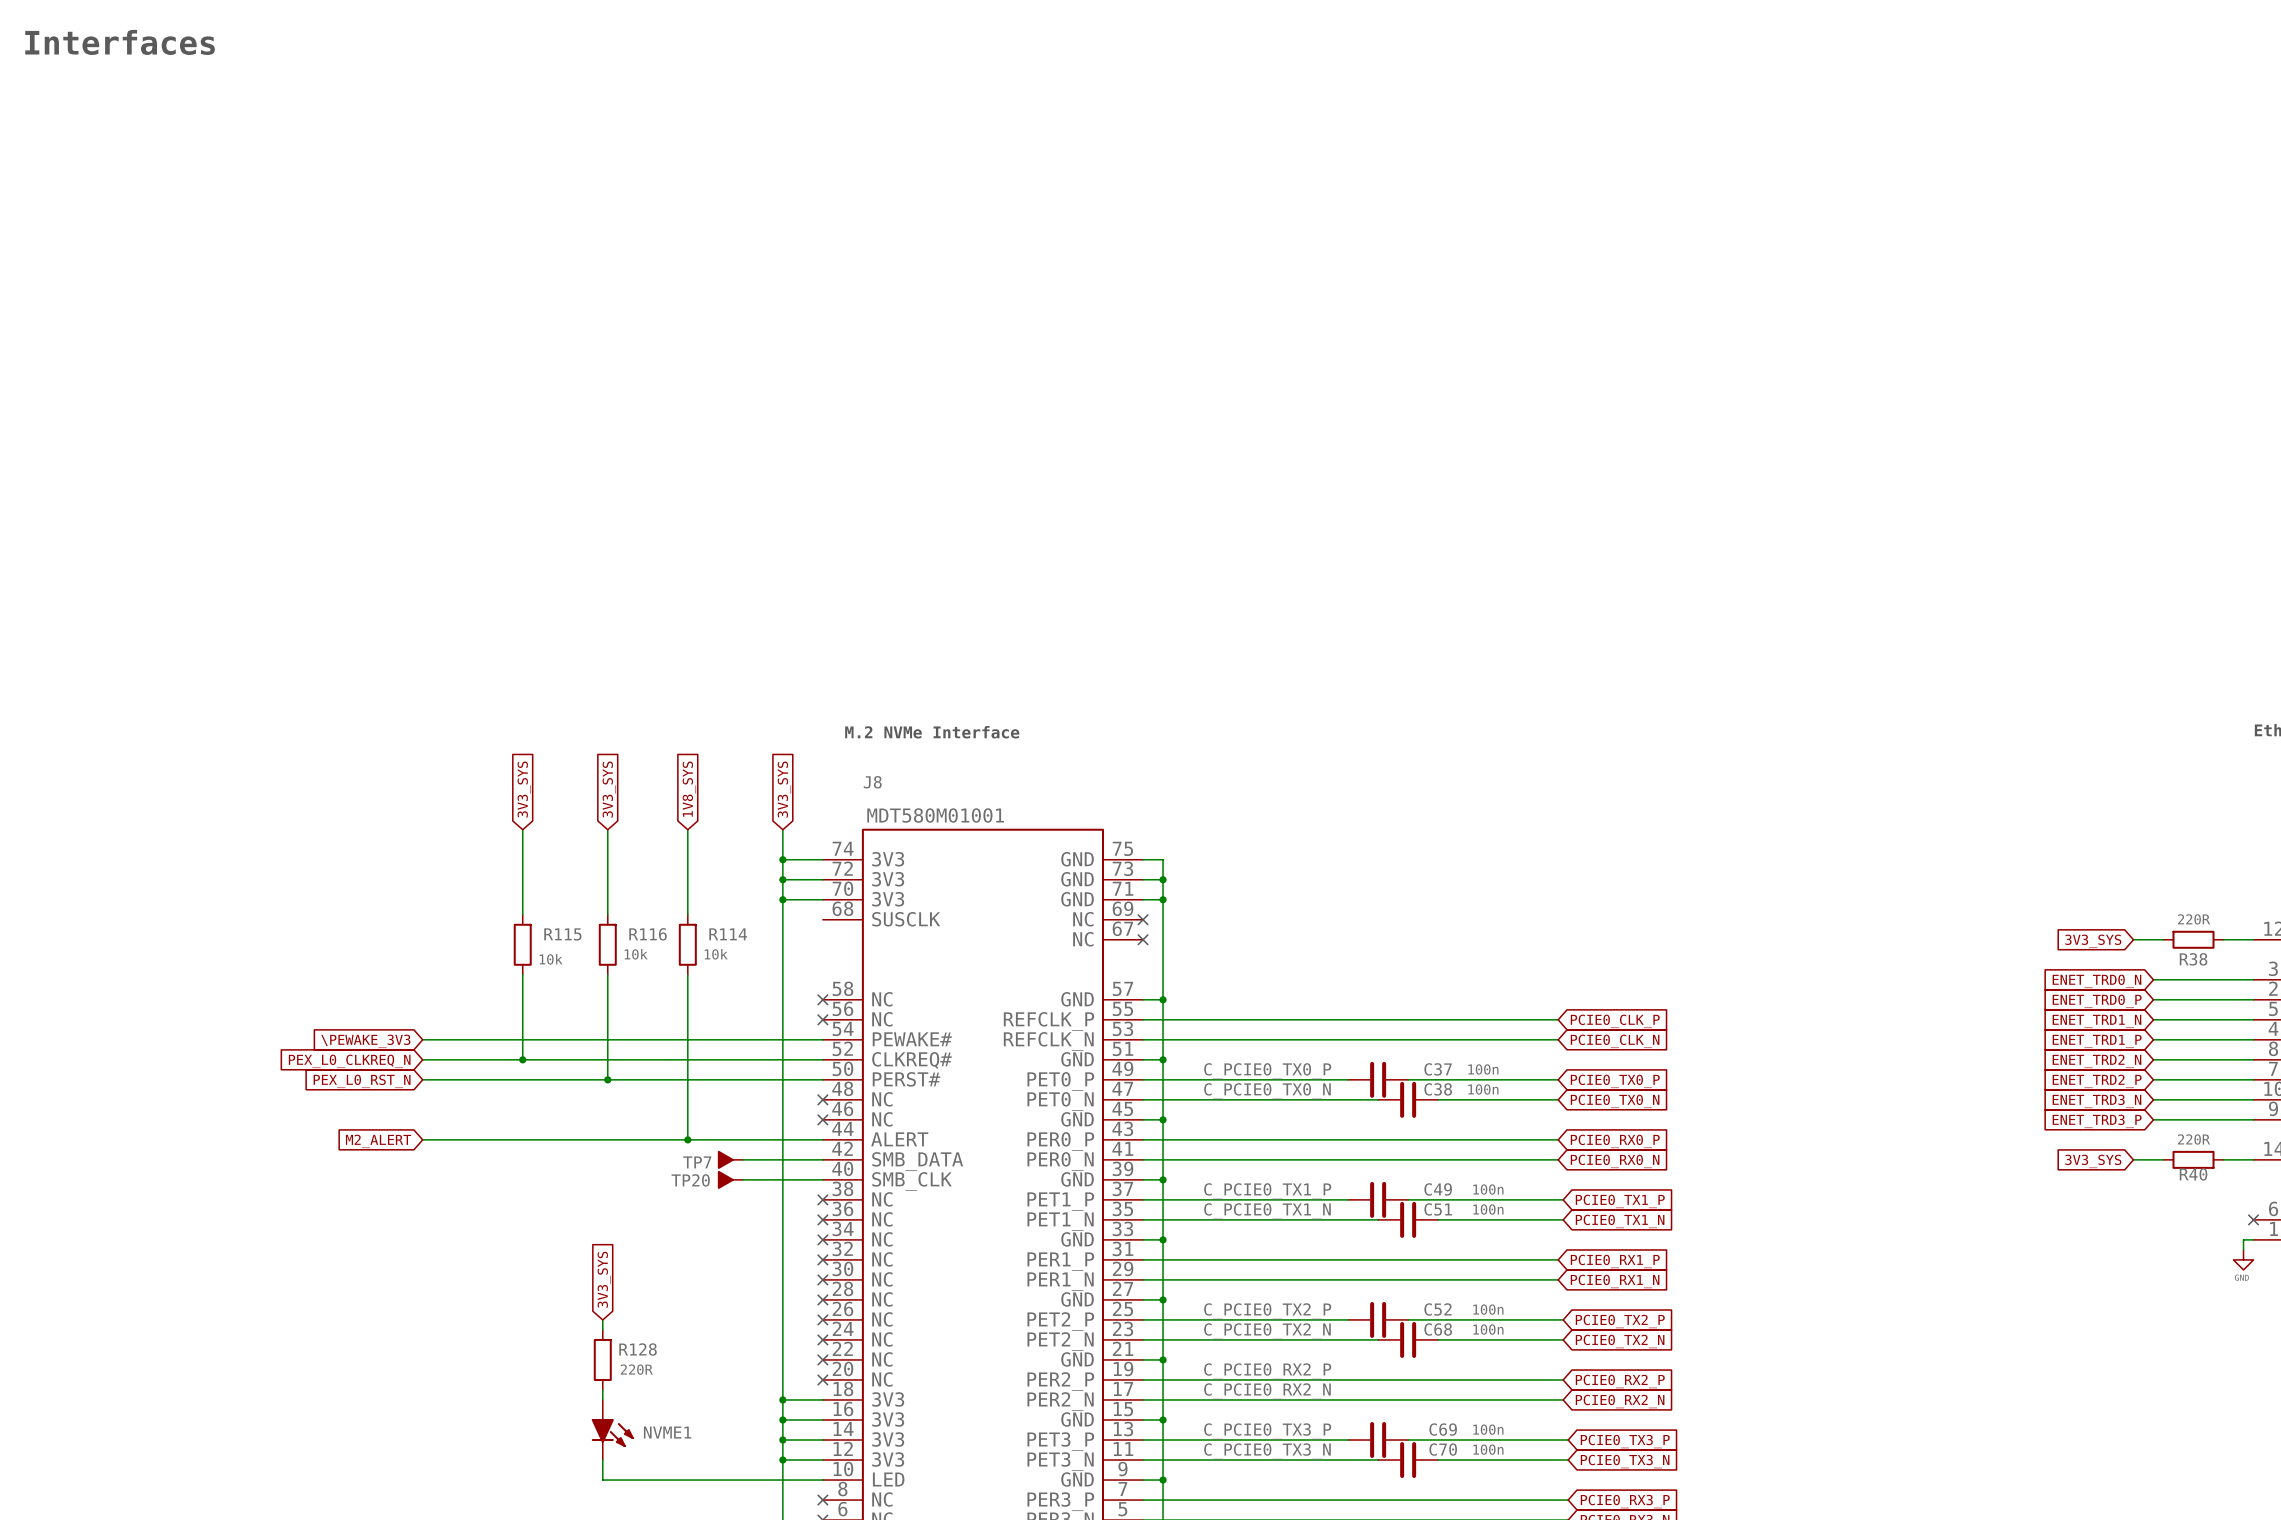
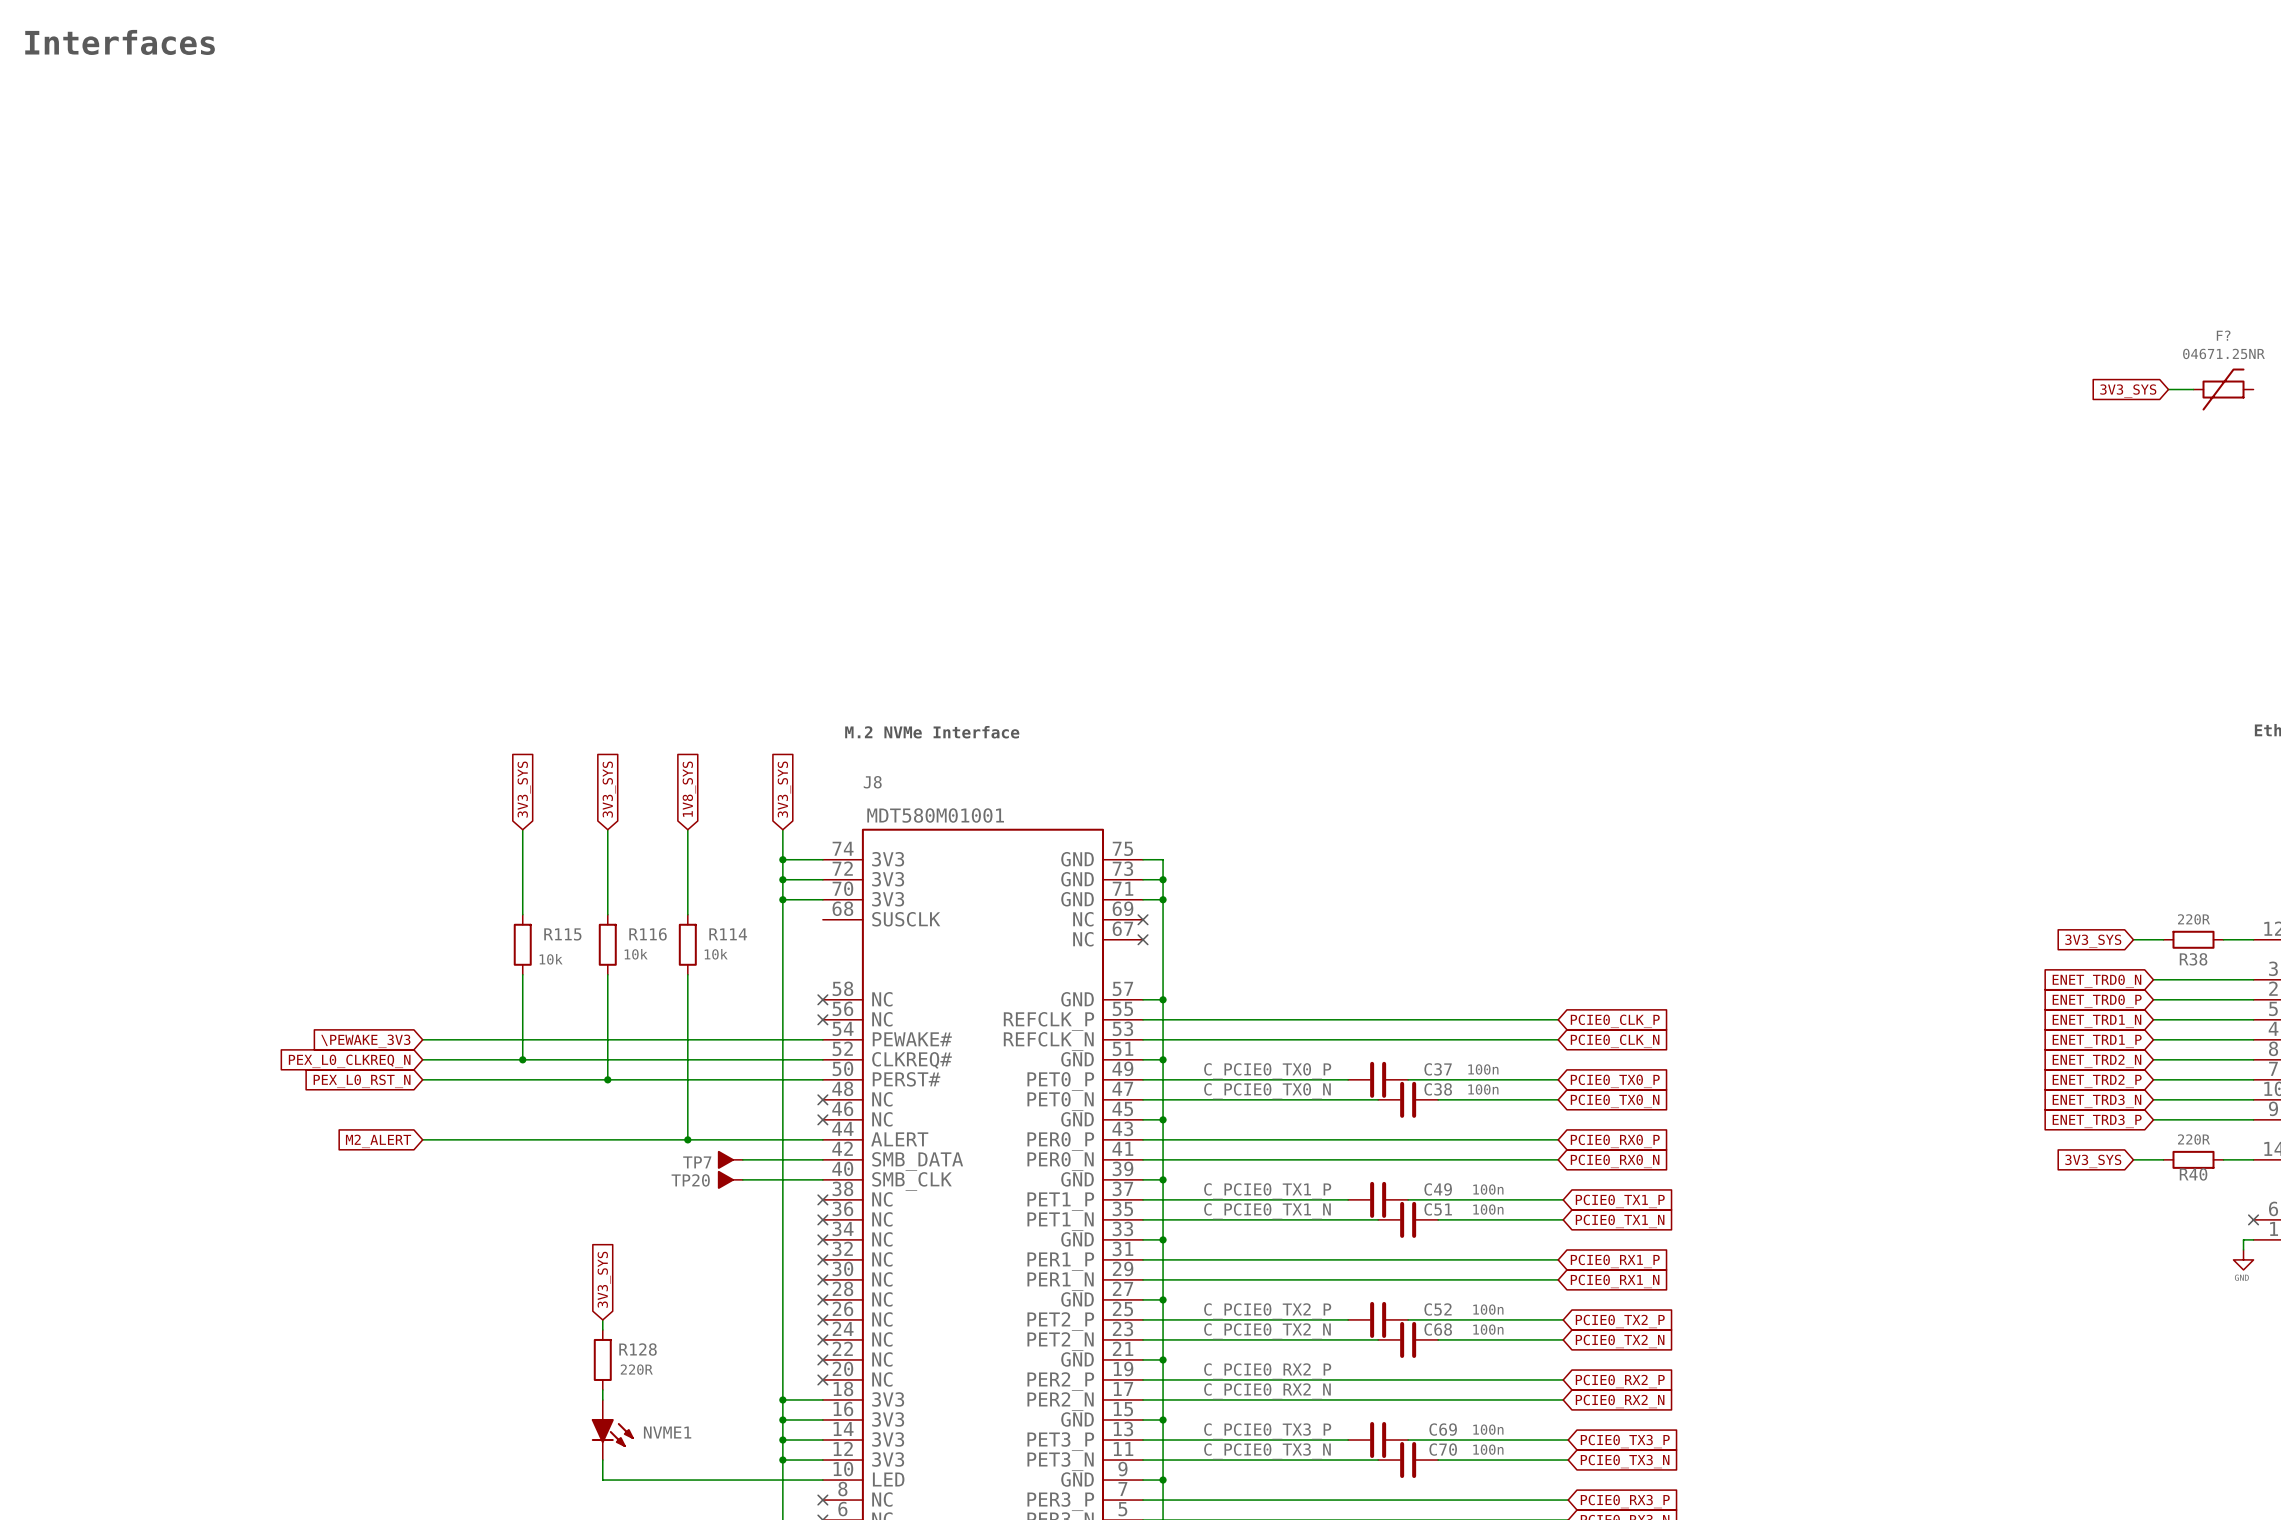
wire: none -> (2168, 389) (2193, 389)
F?: none -> 04671.25NR (2223, 389)
global label: none -> 3V3_SYS (2128, 391)

